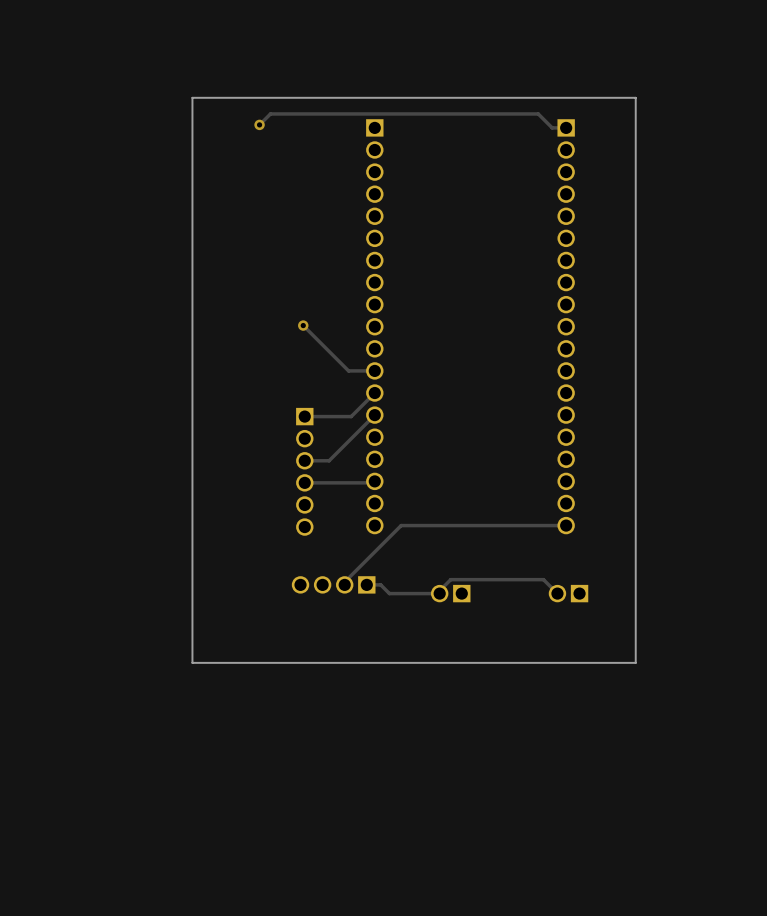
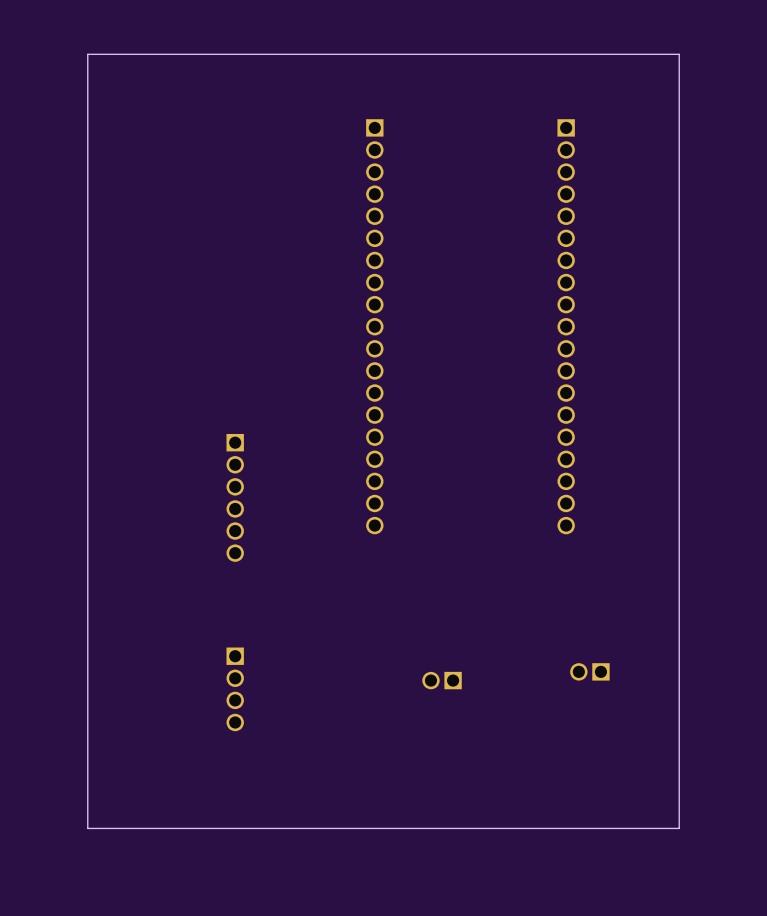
board edge: (635, 97) (192, 97) (192, 662) (635, 662) (635, 97) -> (679, 54) (679, 828) (87, 828) (87, 54) (679, 54)
track: (259, 124) (270, 113) (538, 113) (552, 127) (566, 127) -> none
via: (259, 124) -> none
track: (303, 325) (348, 370) (374, 370) -> none
via: (303, 325) -> none
track: (374, 393) (351, 416) (304, 416) -> none
track: (374, 415) (329, 460) (304, 460) -> none
part position: (304, 471) -> (235, 497)
track: (374, 481) (304, 482) -> none
track: (566, 525) (401, 525) (344, 582) (344, 584) -> none
part rotation: 0° (333, 584) -> 90° counterclockwise (235, 689)
part position: (333, 584) -> (235, 689)
track: (366, 584) (380, 584) (389, 593) (439, 593) (439, 590) (450, 579) (543, 579) (557, 593) -> none
part: (450, 593) -> none
part: (568, 593) -> none
part: none -> (589, 671)
part: none -> (442, 680)

